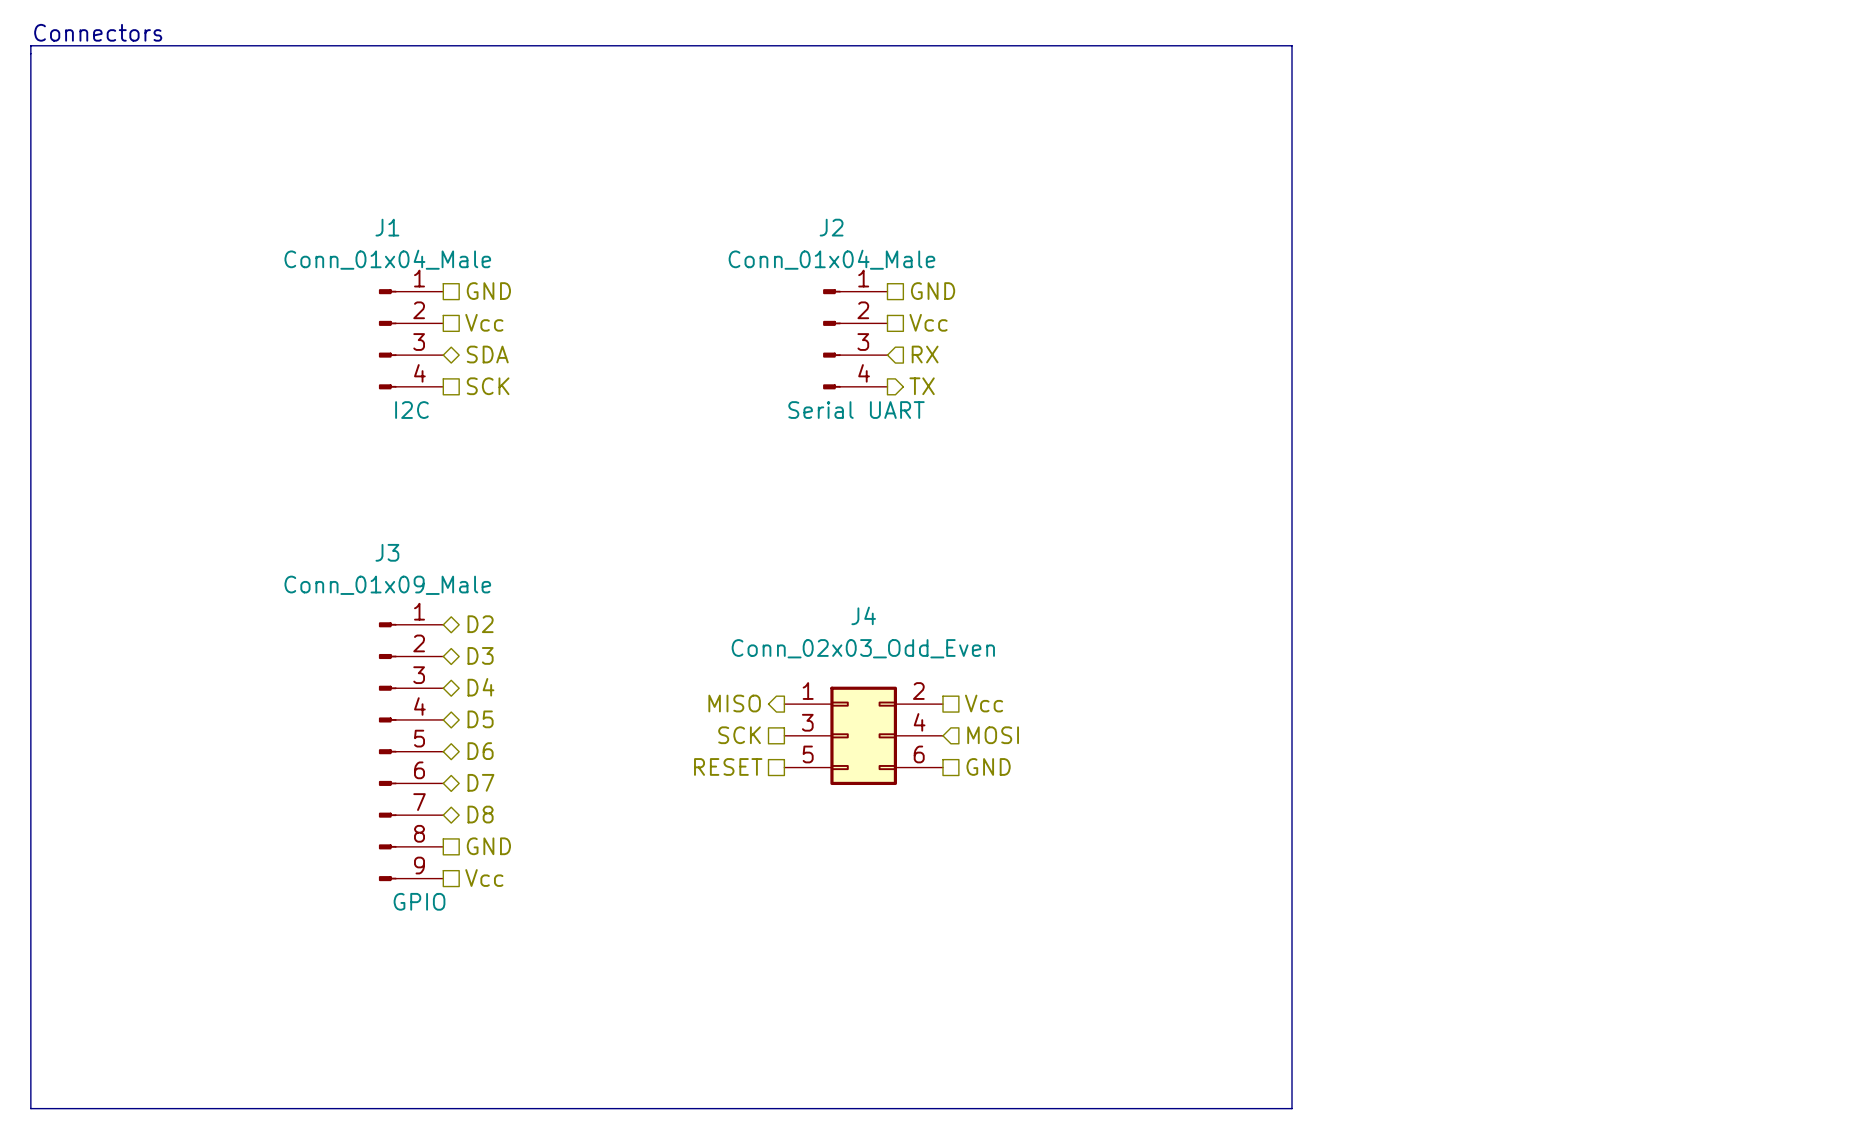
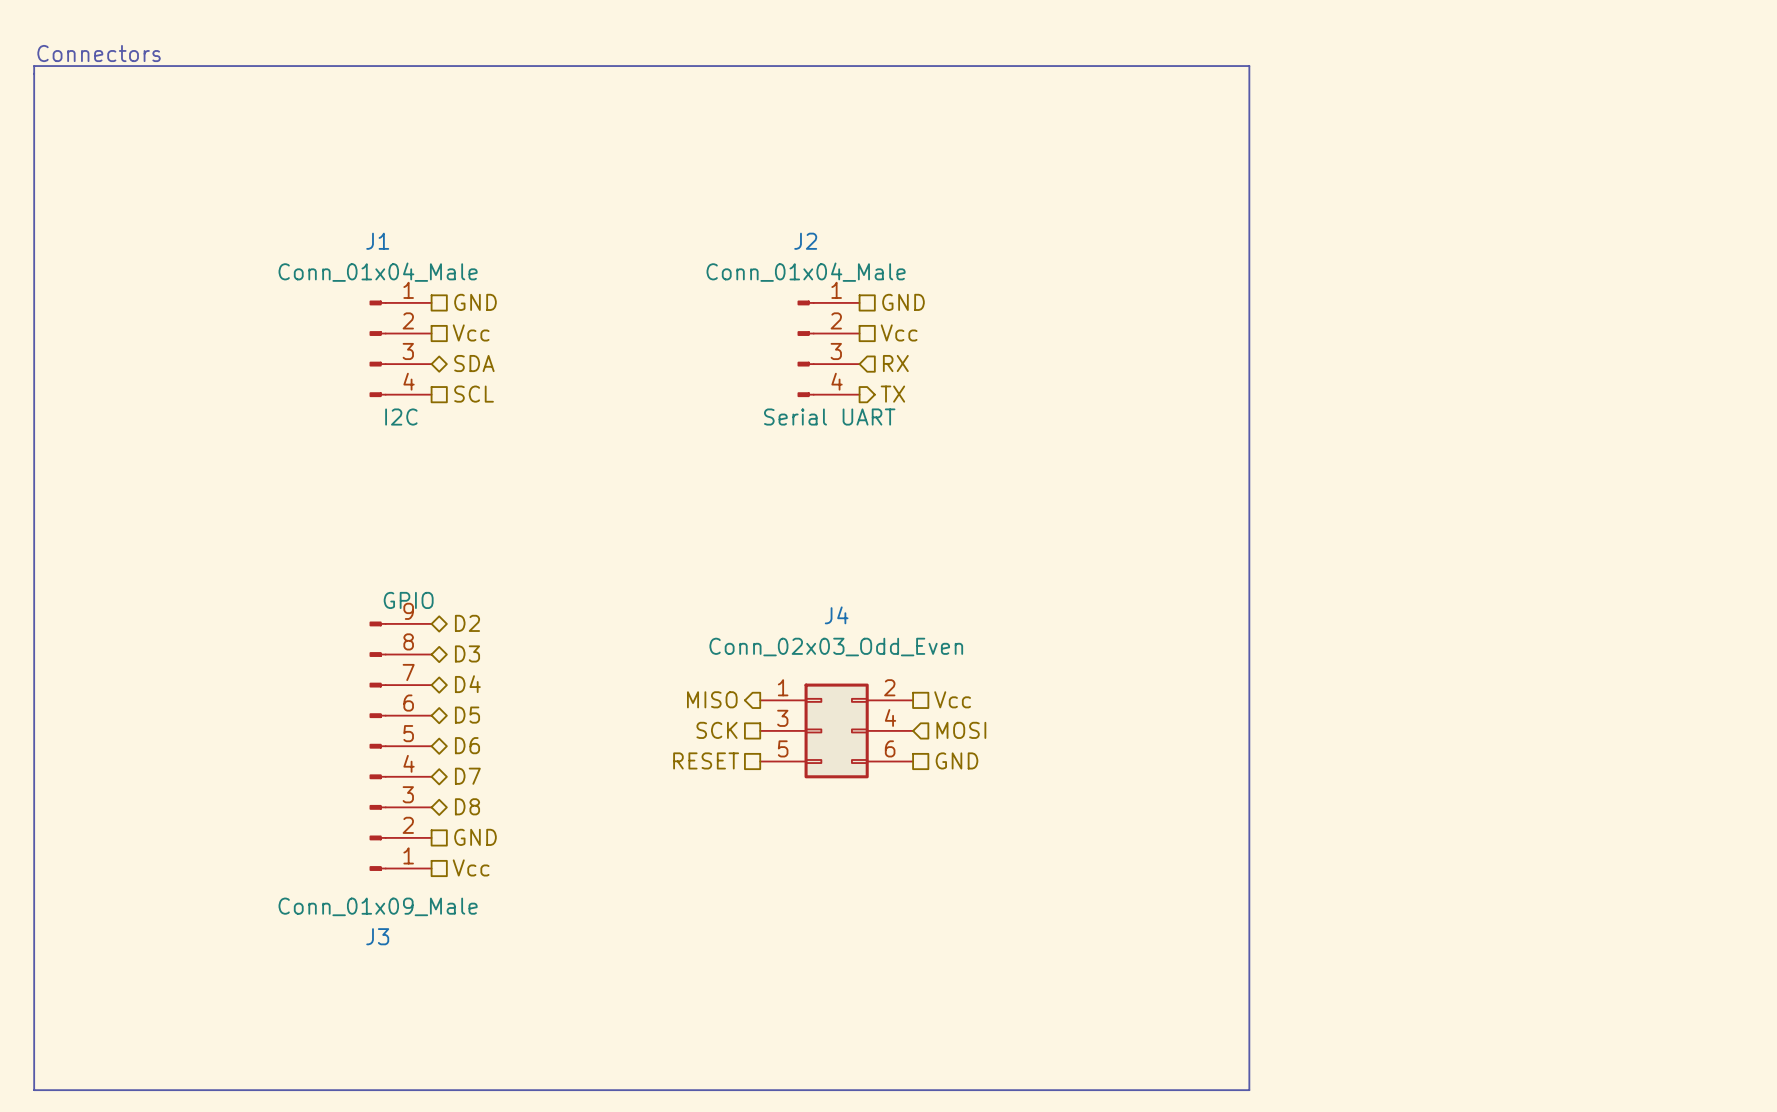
hierarchical label: SCK (488, 386) -> SCL (474, 394)
J3 flip: as is (387, 751) -> up-down (378, 746)

